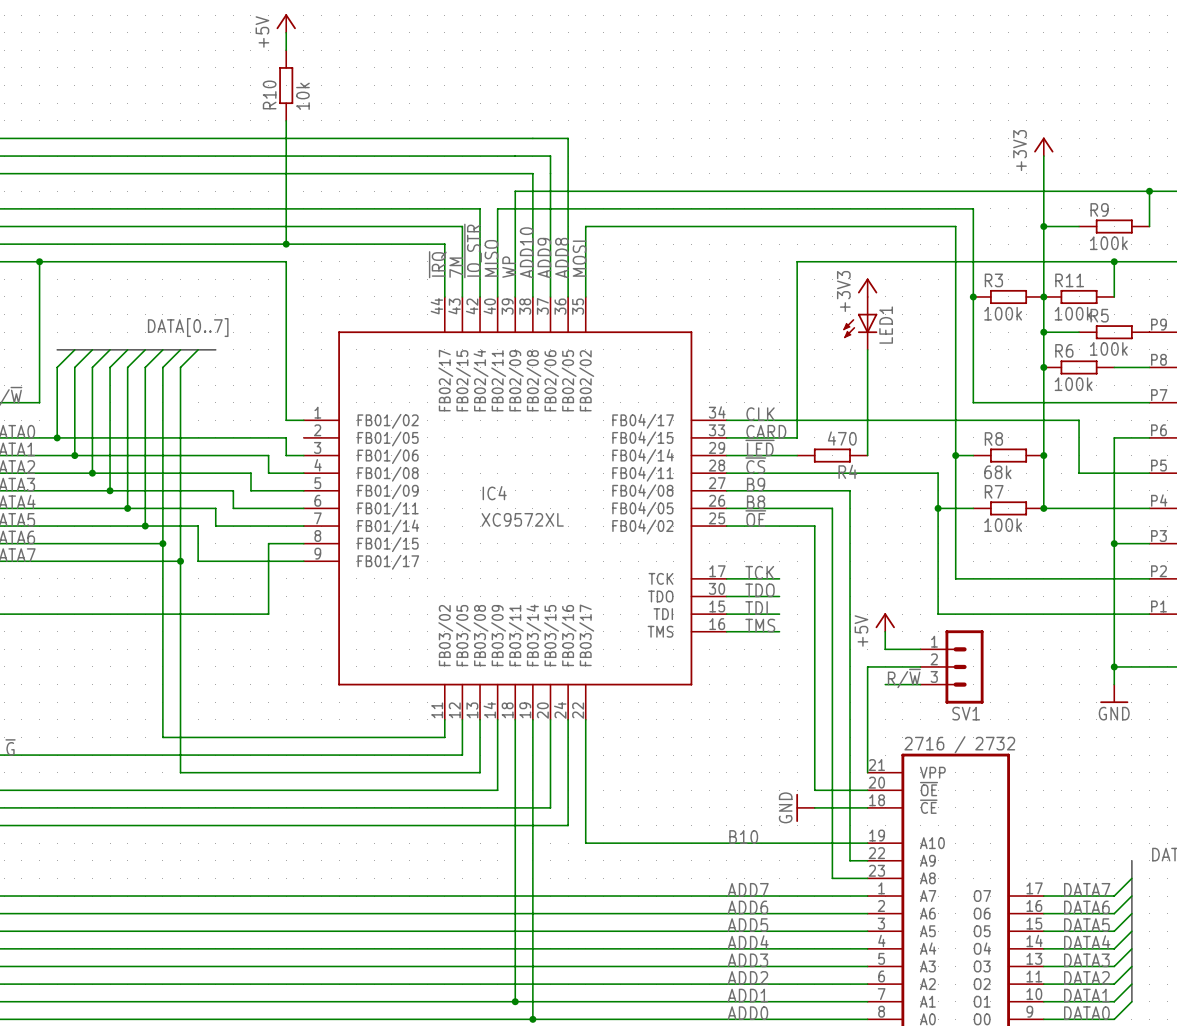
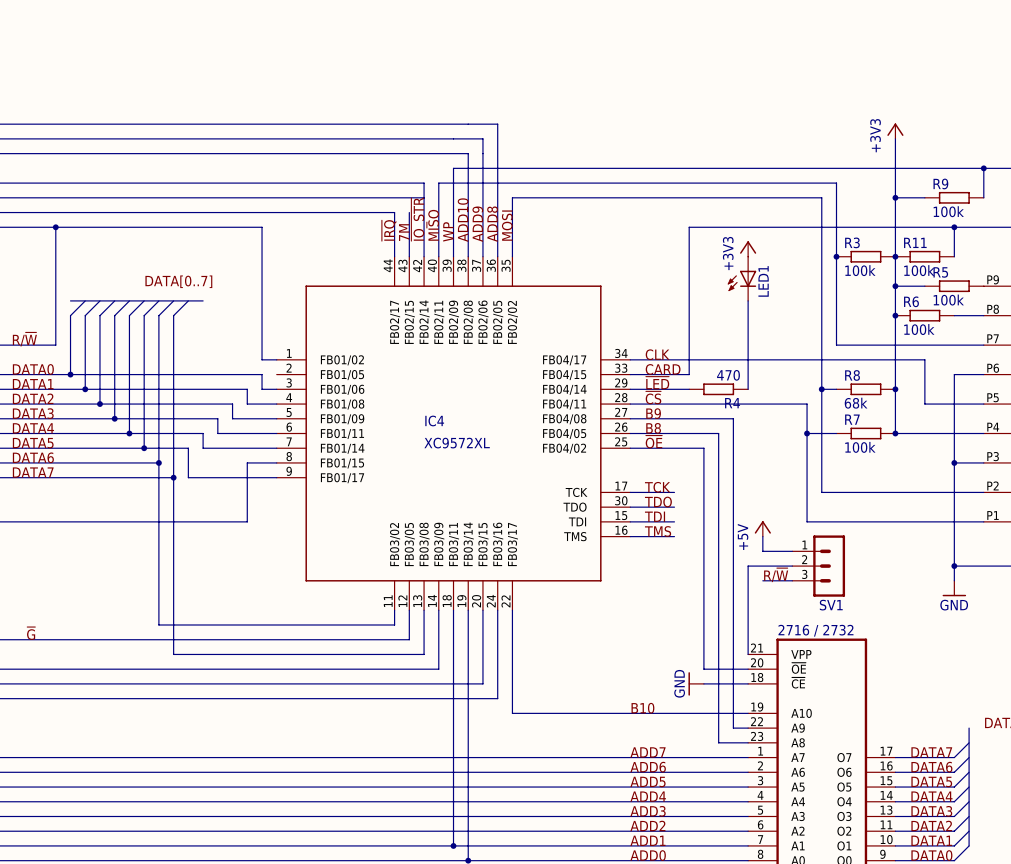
power symbol: +5V (286, 23) -> none
wire: (286, 32) (286, 50) -> none
R10: 10k (286, 85) -> none
wire: (286, 120) (286, 244) -> none
wire: (462, 226) (462, 244) -> (409, 197) (424, 197)
junction: (286, 244) -> none

